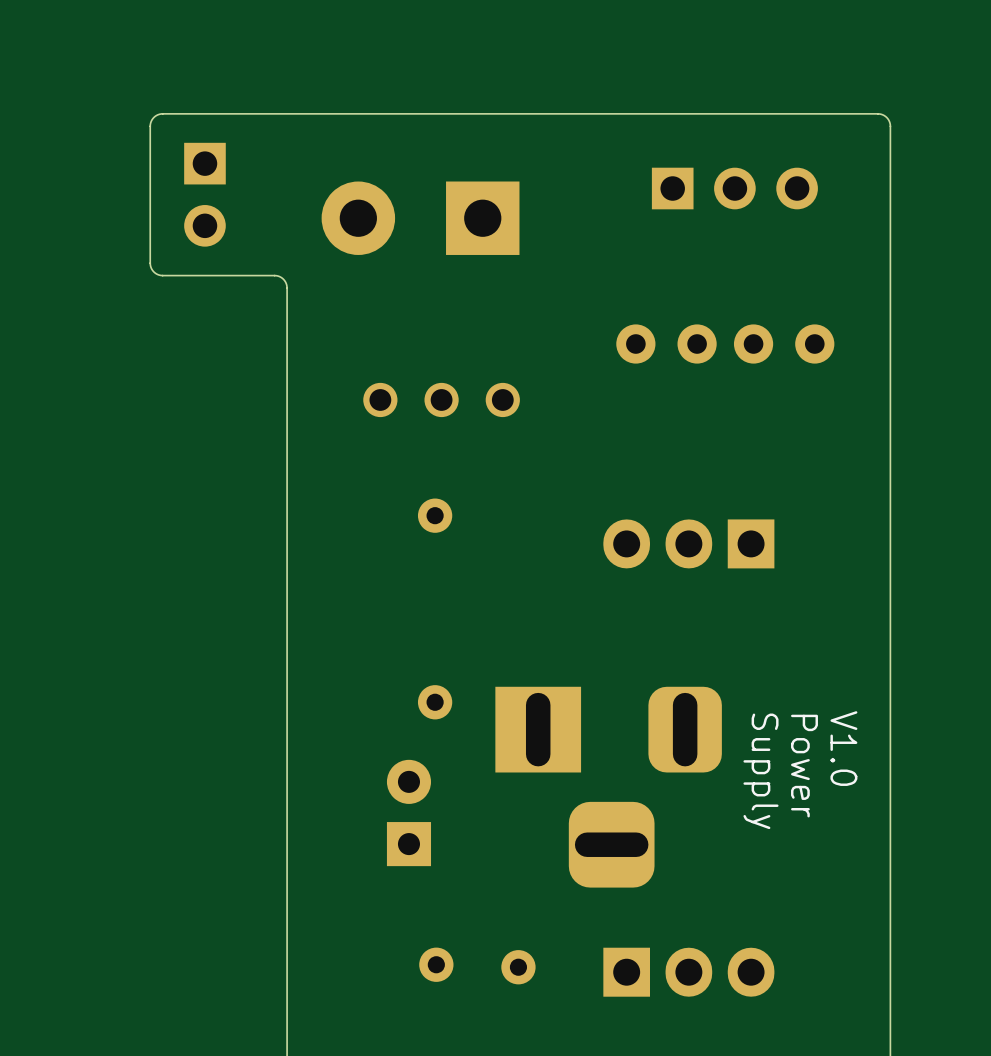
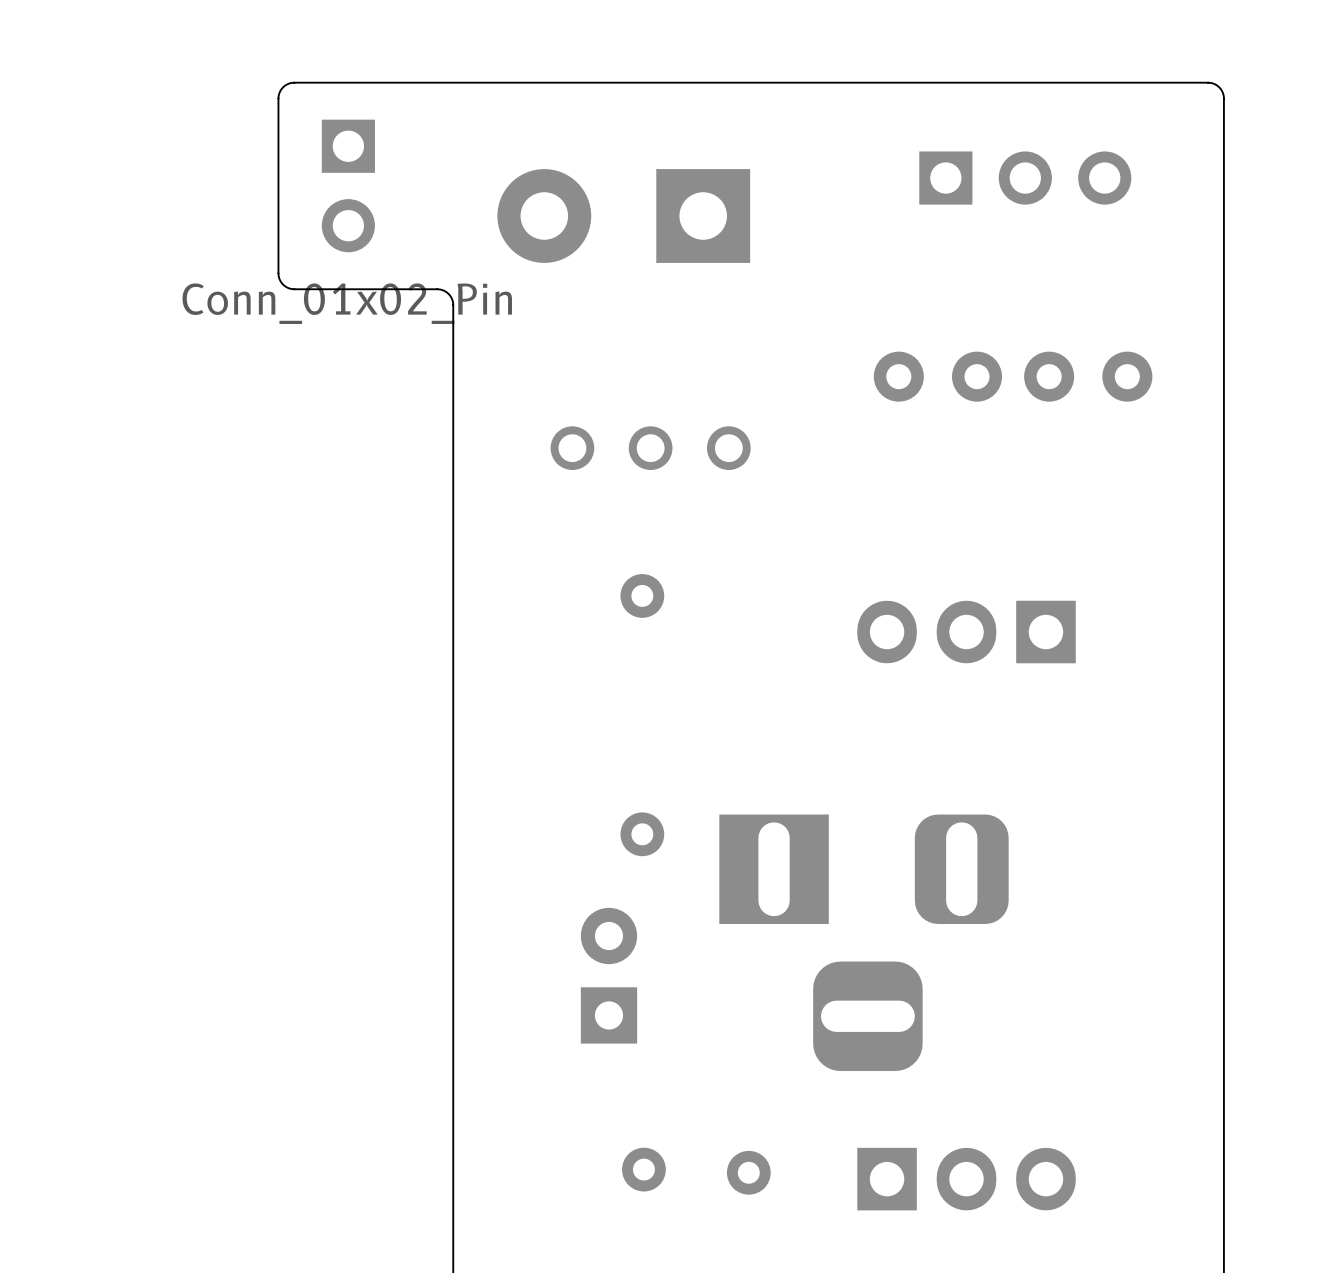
part value: none -> Conn_01x02_Pin (347, 303)
text: V1.0 (843, 748) -> none
text: Power (804, 766) -> none
text: Supply (760, 771) -> none

